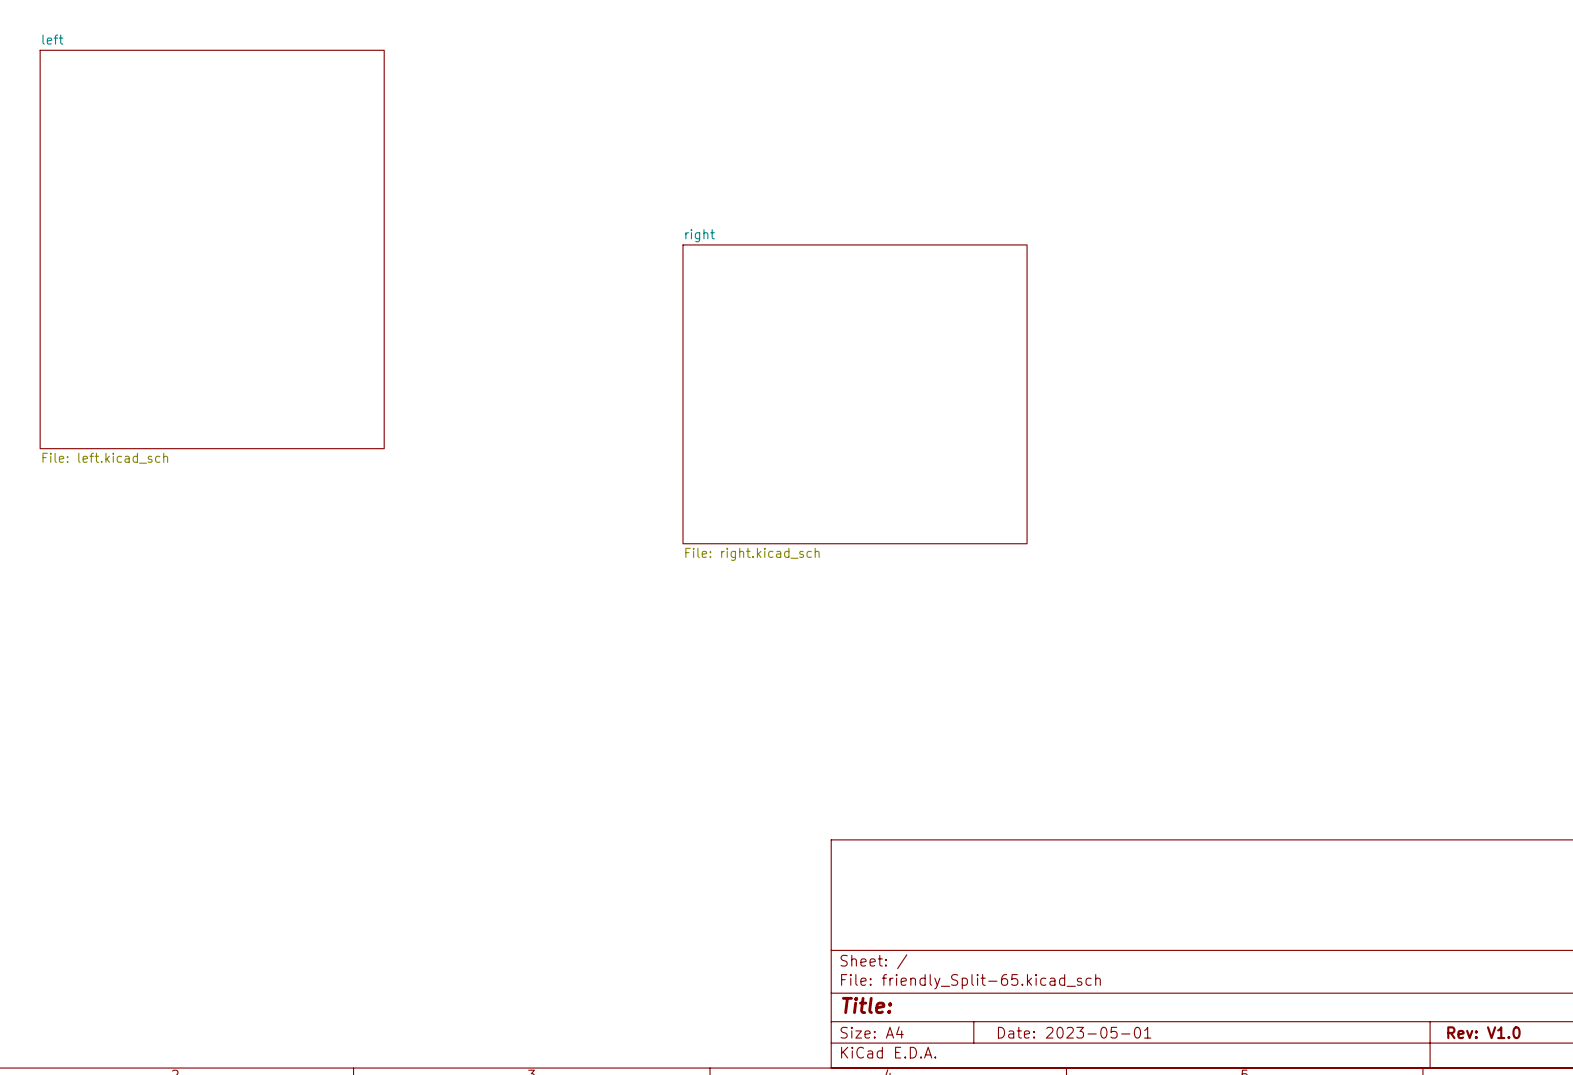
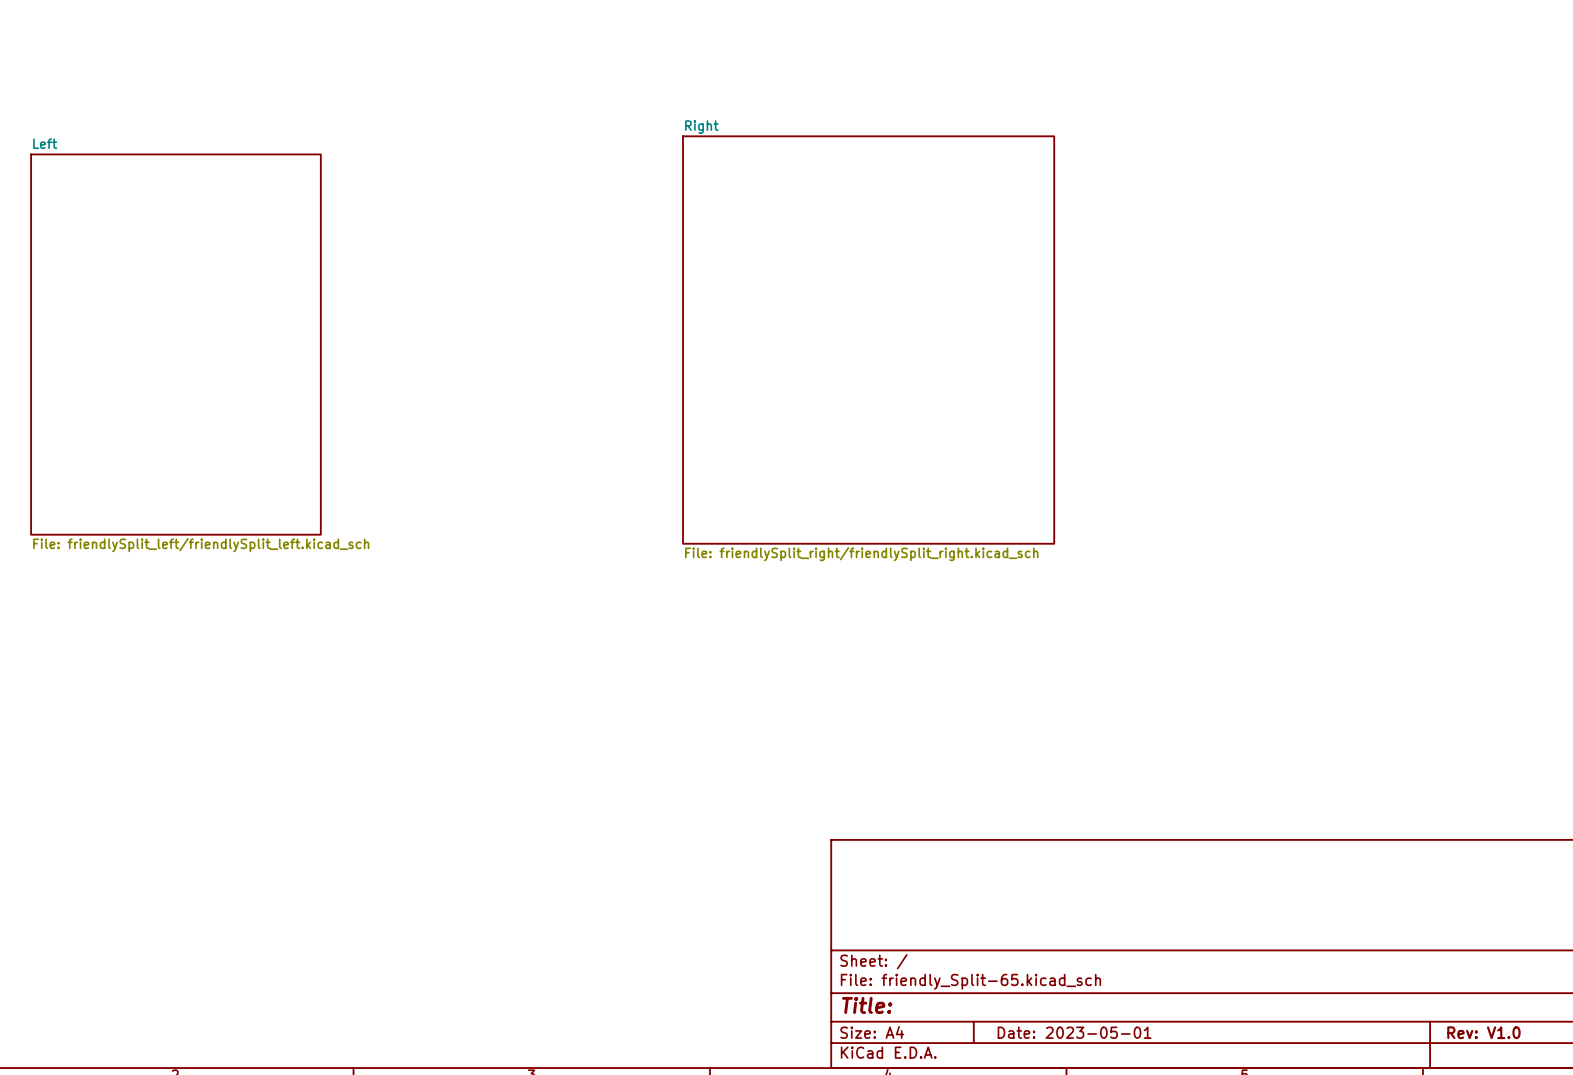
sheet left: File: left.kicad_sch (212, 249) -> none
sheet Right: none -> File: friendlySplit_right/friendlySplit_right.kicad_sch (868, 340)
sheet Left: none -> File: friendlySplit_left/friendlySplit_left.kicad_sch (175, 344)
sheet right: File: right.kicad_sch (855, 394) -> none

